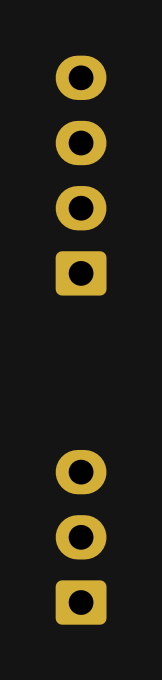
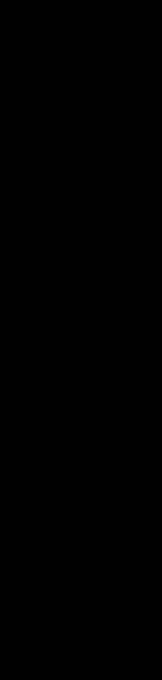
part: (81, 175) -> none
part: (81, 537) -> none

